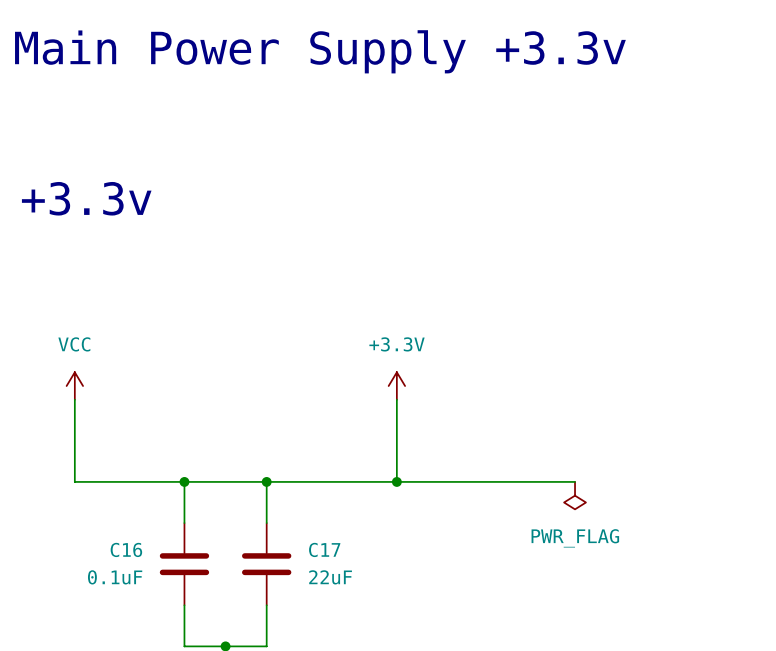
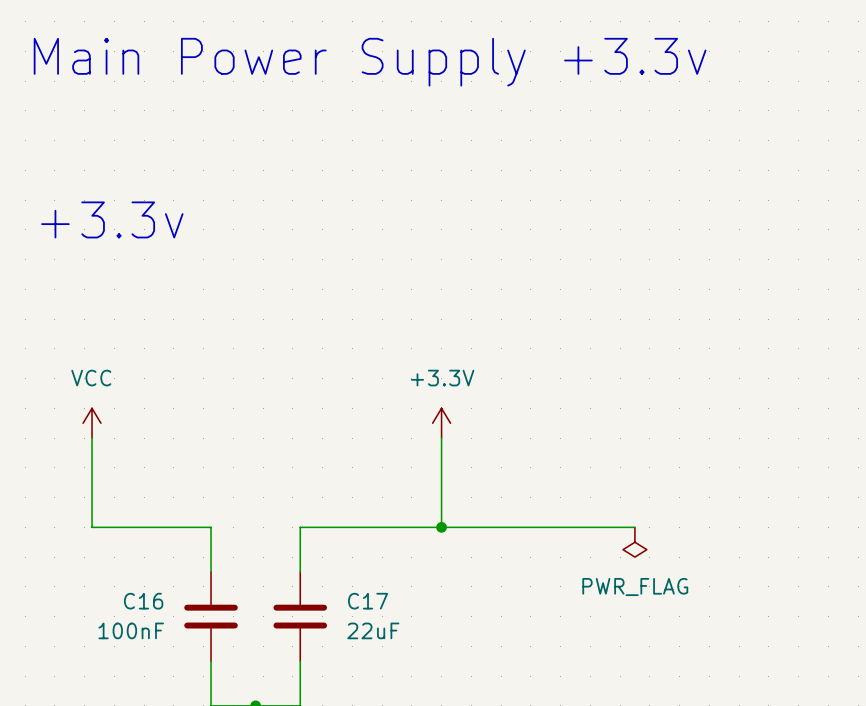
wire: (184, 481) (266, 481) -> none
junction: (184, 481) -> none
junction: (266, 481) -> none
C16 value: 0.1uF (115, 577) -> 100nF (131, 630)

